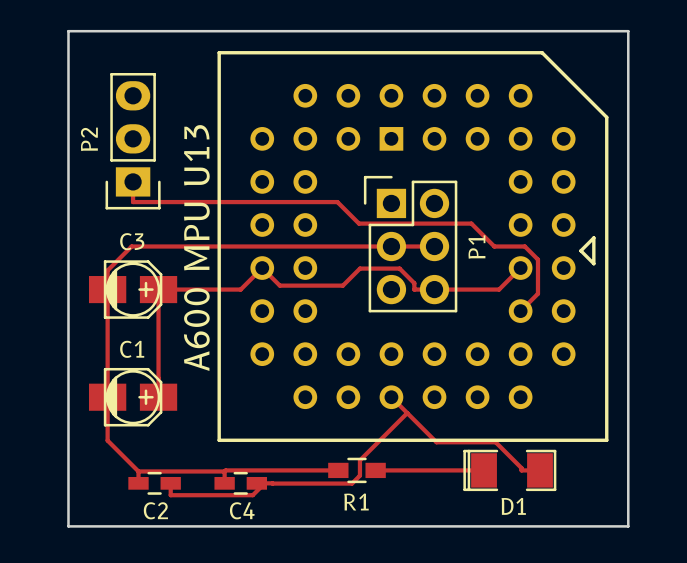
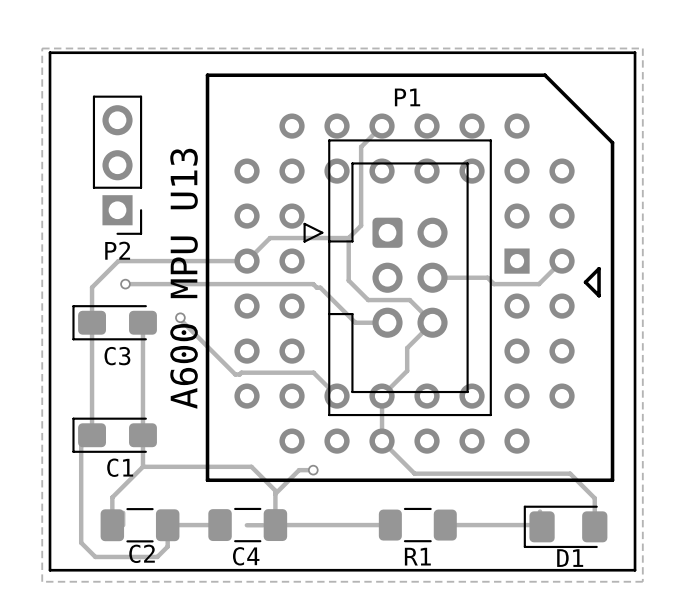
zone outline: none -> (42, 48) (42, 581) (642, 581) (642, 48) (42, 48)
P2 footprint: [105, 72, 161, 210] -> [92, 95, 143, 235]
part footprint: [250, 83, 576, 410] -> [234, 113, 575, 454]
track: none -> (382, 126) (361, 146) (361, 225) (348, 238)
P2 name position: P2 (89, 139) -> P2 (117, 250)
P1 footprint: [363, 175, 458, 313] -> [303, 139, 492, 417]
track: (133, 181) (133, 202) (337, 202) (359, 223) (471, 223) (494, 246) (524, 246) (537, 259) (537, 293) (520, 311) -> none
track: none -> (348, 238) (270, 238) (247, 261) (118, 261) (92, 287) (92, 435) (81, 446) (81, 542) (95, 556) (157, 556) (167, 546) (167, 525)
track: none -> (348, 238) (348, 280) (368, 300) (409, 300) (432, 322) (407, 348) (407, 370) (382, 396) (382, 441) (414, 473) (570, 473) (594, 498) (594, 526)
C3 name position: C3 (132, 241) -> C3 (117, 356)
track: (434, 246) (131, 246) (107, 270) (107, 440) (138, 471) (338, 470) -> (432, 277) (487, 277) (494, 284) (539, 284) (562, 261)
P1 name position: P1 (476, 247) -> P1 (407, 97)
track: none -> (125, 284) (313, 284) (316, 287) (320, 287) (355, 322) (387, 322)
via: none -> (125, 284)
C3 footprint: [88, 260, 178, 319] -> [72, 305, 157, 341]
track: (520, 268) (499, 289) (414, 289) (414, 283) (399, 268) (359, 268) (342, 285) (279, 285) (262, 268) (240, 289) (158, 289) (158, 397) -> none
track: none -> (180, 317) (235, 374) (241, 372) (313, 372) (337, 396)
via: none -> (180, 317)
track: none -> (142, 322) (142, 466)
C1 name position: C1 (132, 349) -> C1 (120, 467)
C1 footprint: [88, 367, 178, 427] -> [72, 417, 157, 453]
track: (391, 397) (436, 442) (495, 442) (521, 468) (521, 470) (540, 470) -> none
track: (407, 413) (359, 460) (359, 475) (352, 483) (272, 483) -> none
track: none -> (142, 466) (112, 497) (112, 525)
track: none -> (142, 466) (251, 466) (275, 490) (275, 525) (390, 525)
track: none -> (313, 470) (299, 470) (275, 493)
via: none -> (313, 470)
D1 footprint: [463, 449, 557, 492] -> [523, 505, 608, 549]
R1 footprint: [328, 457, 386, 484] -> [378, 507, 457, 543]
track: (375, 470) (484, 470) -> none
C2 footprint: [128, 471, 181, 495] -> [100, 508, 180, 543]
C4 footprint: [214, 471, 268, 495] -> [208, 507, 288, 543]
track: (170, 483) (170, 495) (252, 495) (264, 483) -> none
track: none -> (167, 525) (220, 525)
track: none -> (445, 525) (540, 525) (542, 526)

